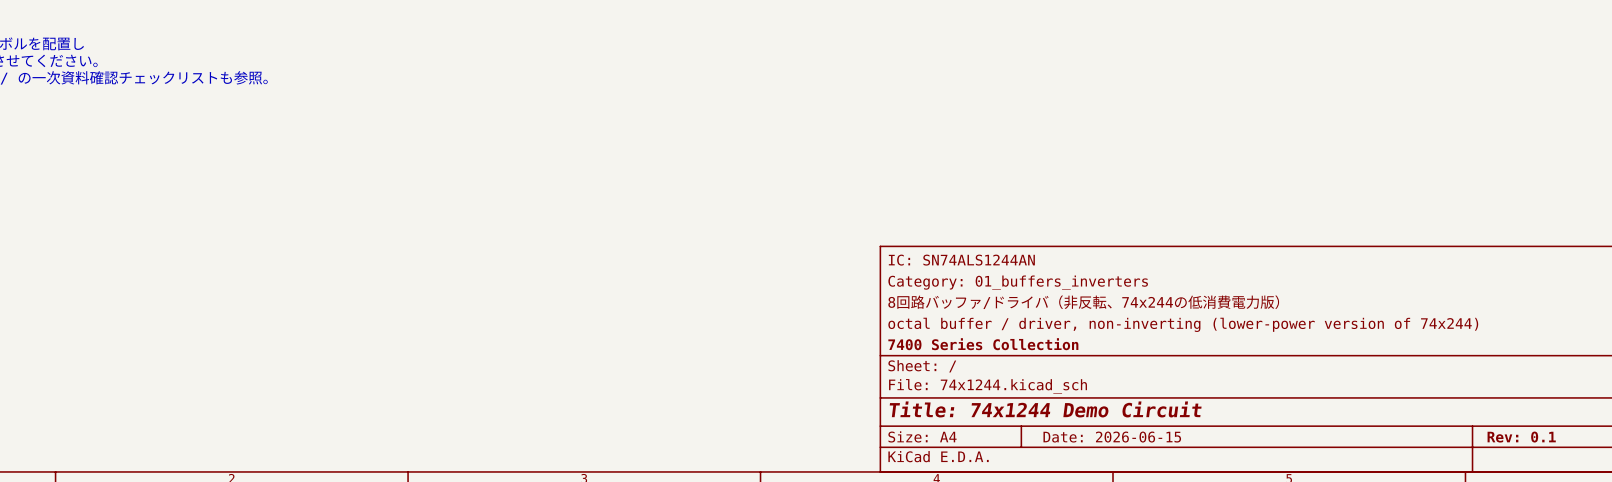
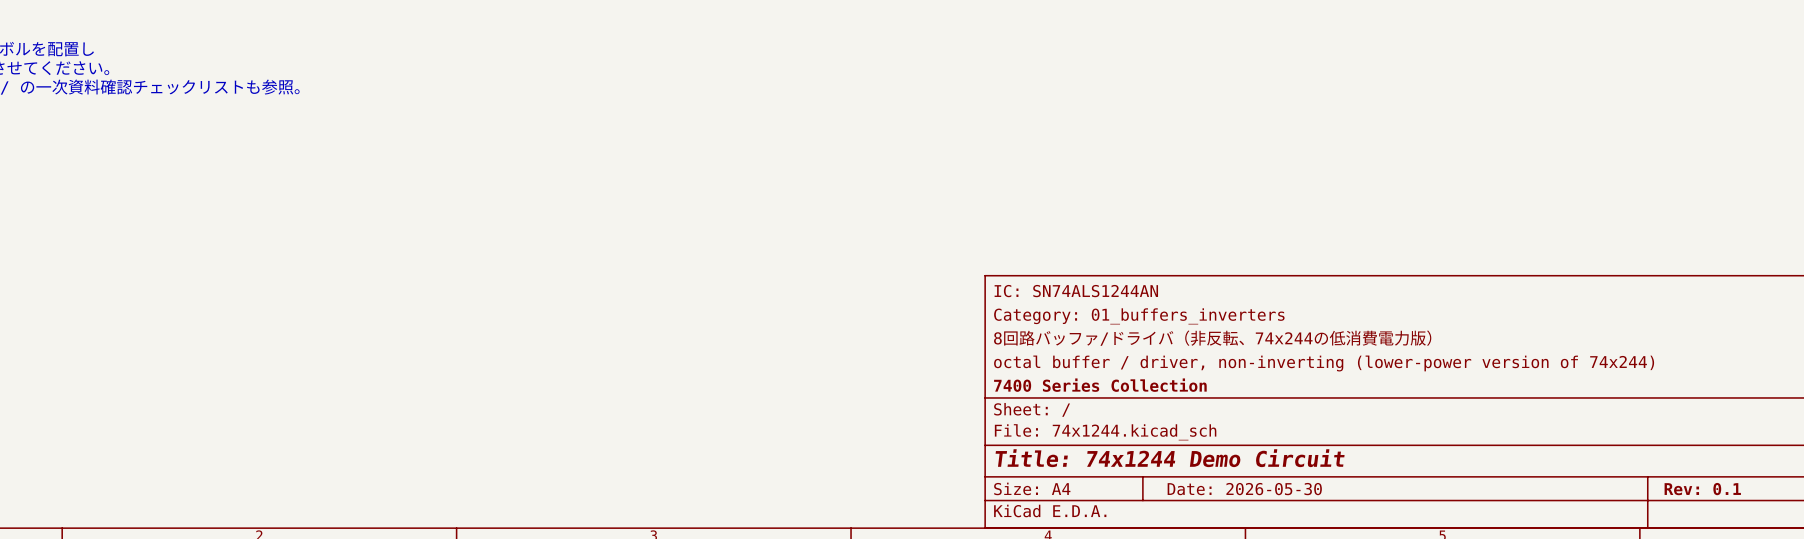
title block: Date: 2026-06-15 (1112, 437) -> Date: 2026-05-30 (1244, 489)

